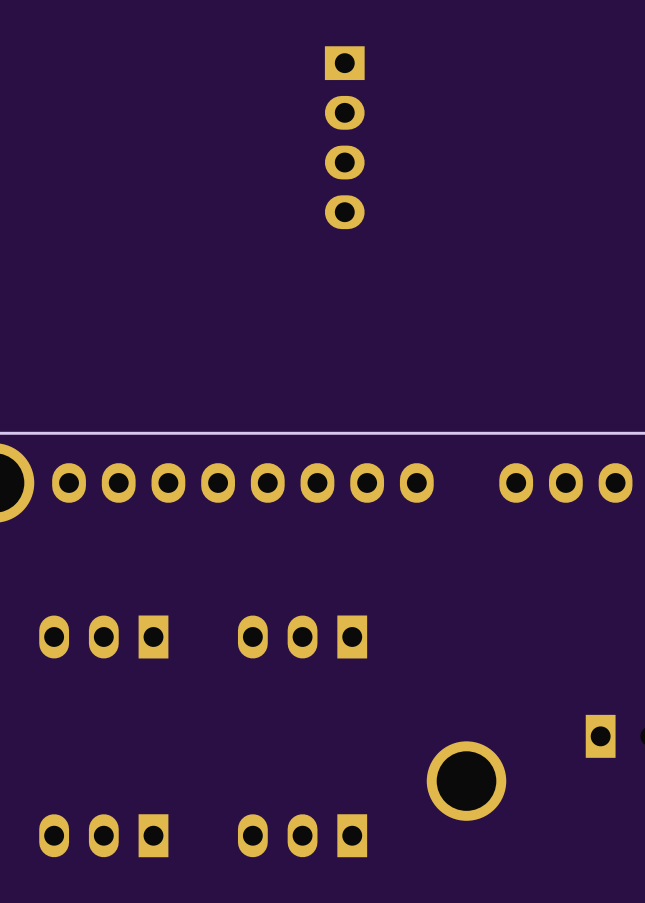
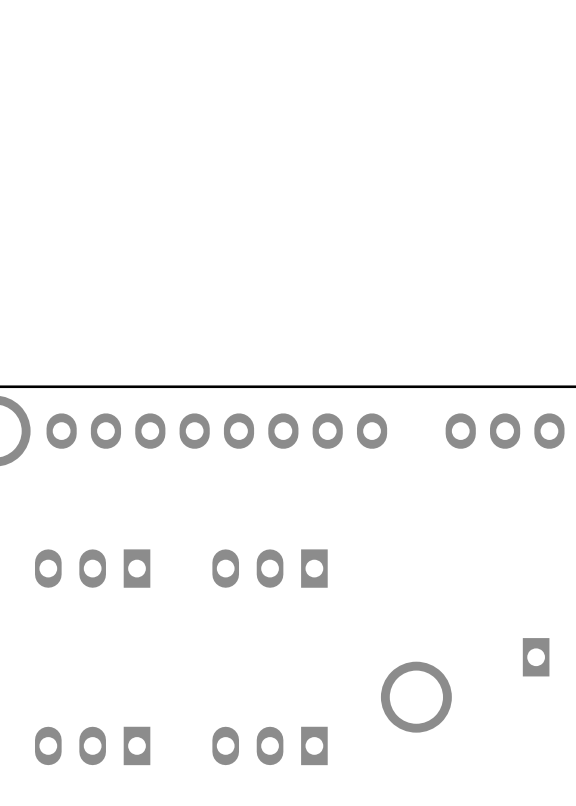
part: (344, 137) -> none

